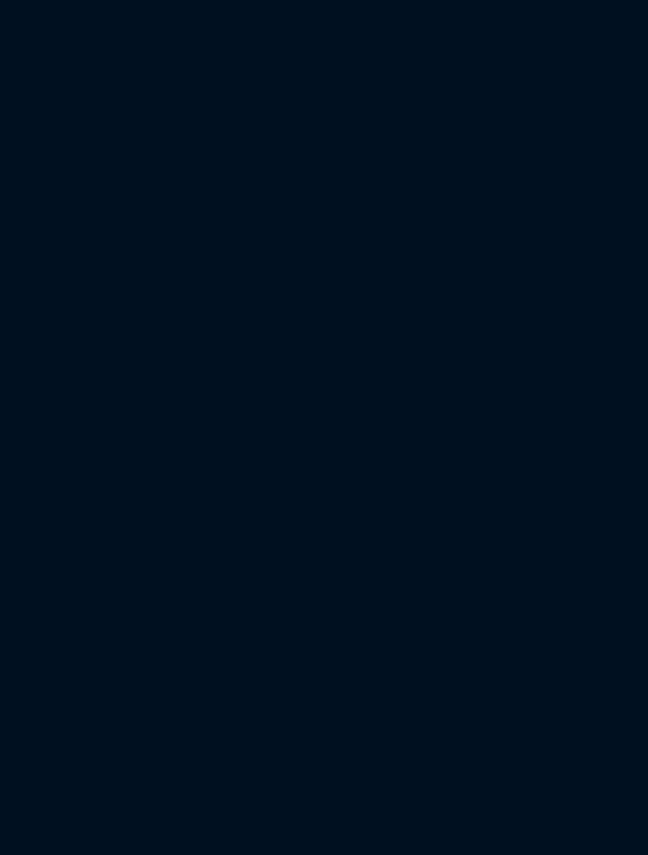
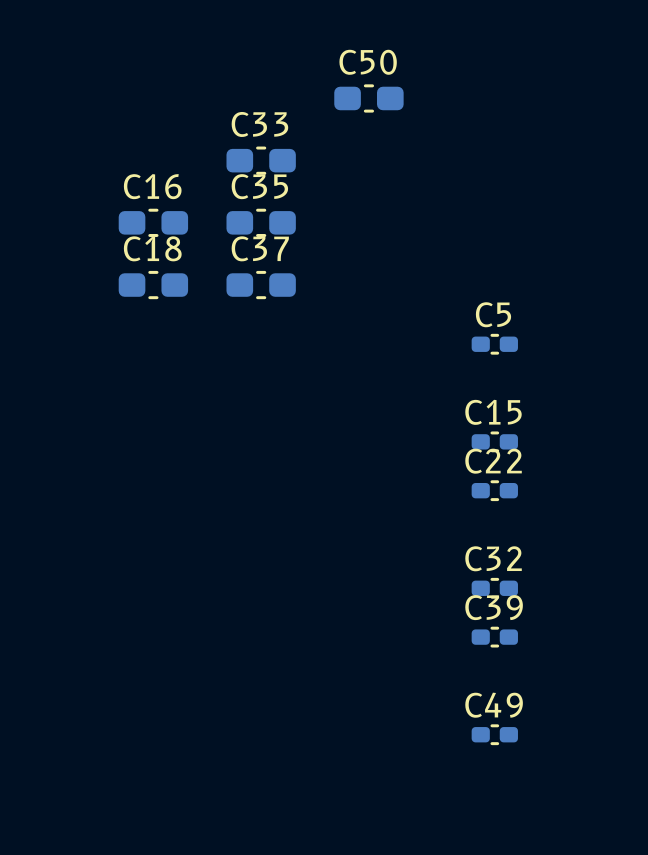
C50: none -> (368, 98)
C33: none -> (261, 160)
C16: none -> (153, 222)
C35: none -> (261, 222)
C18: none -> (153, 285)
C37: none -> (261, 285)
C5: none -> (494, 344)
C15: none -> (494, 441)
C22: none -> (494, 490)
C32: none -> (494, 588)
C39: none -> (494, 637)
C49: none -> (494, 734)

